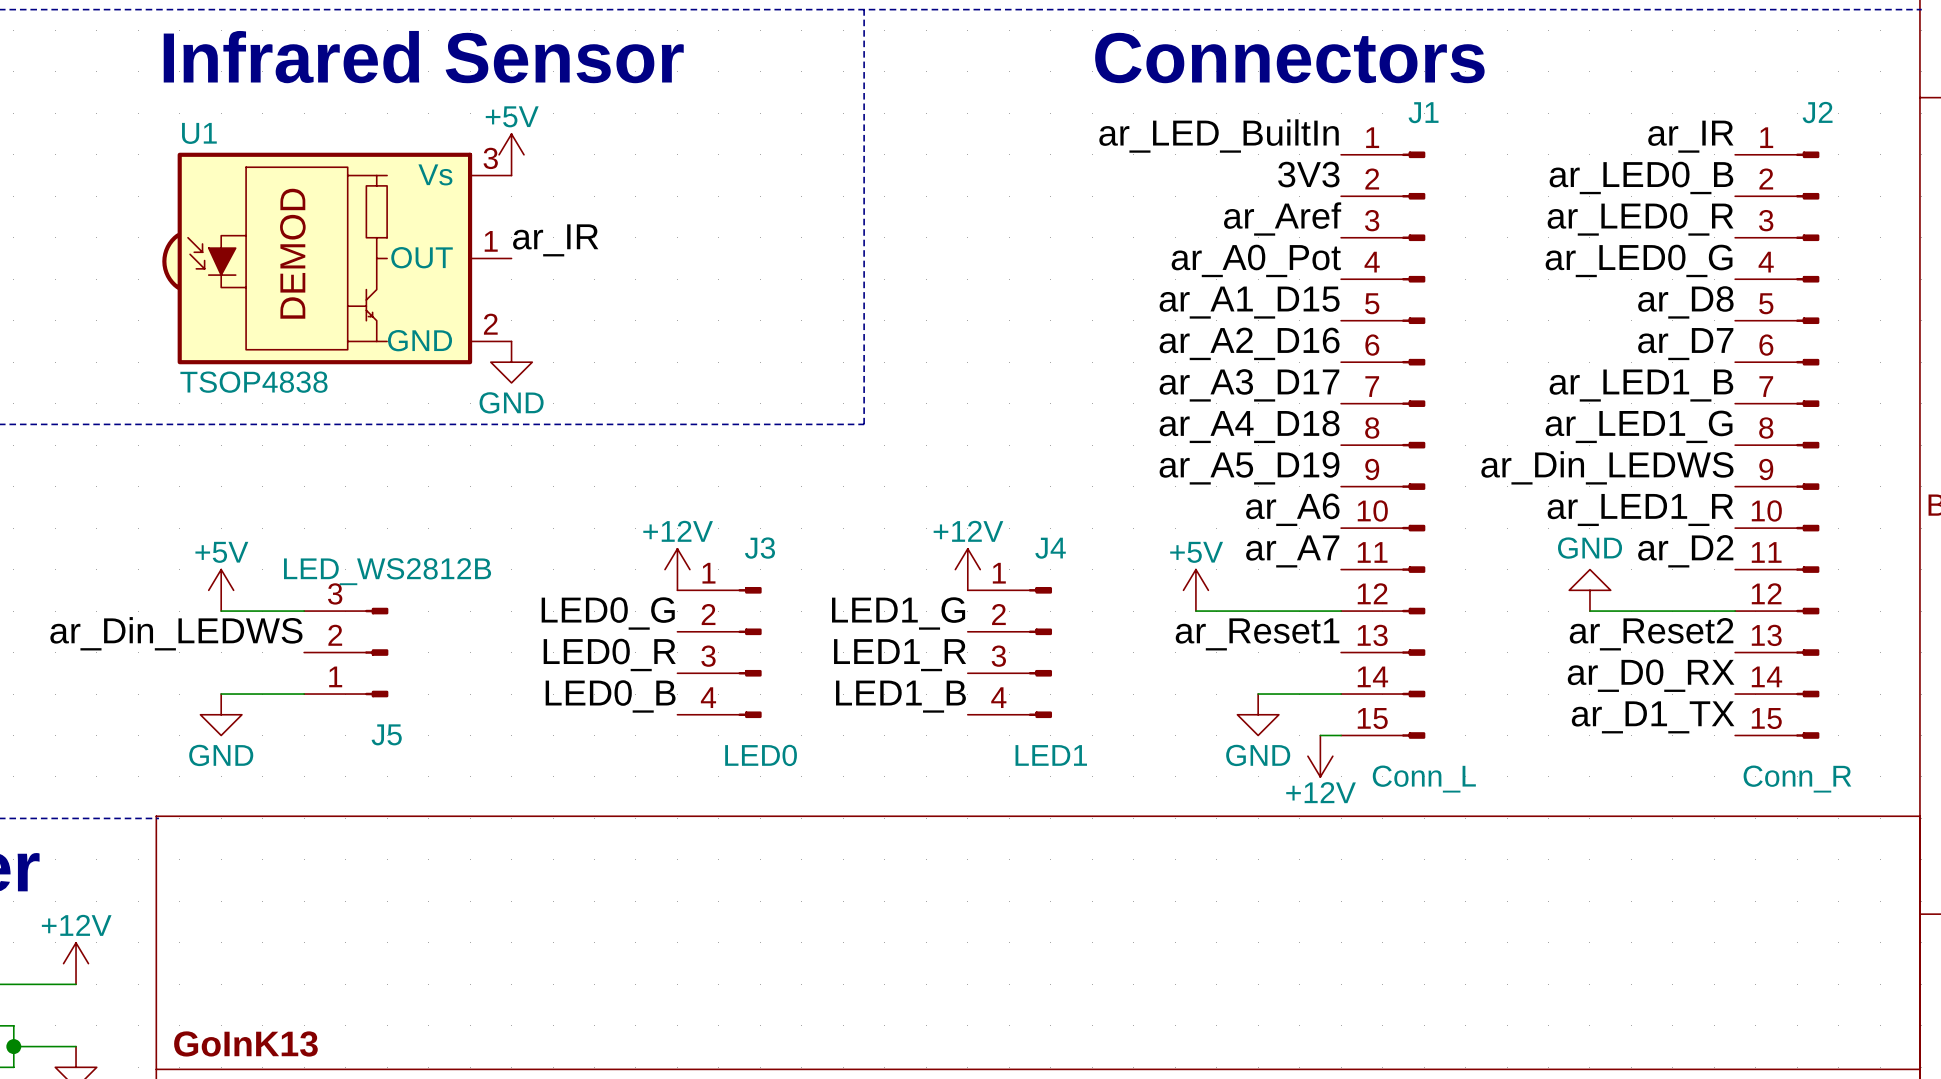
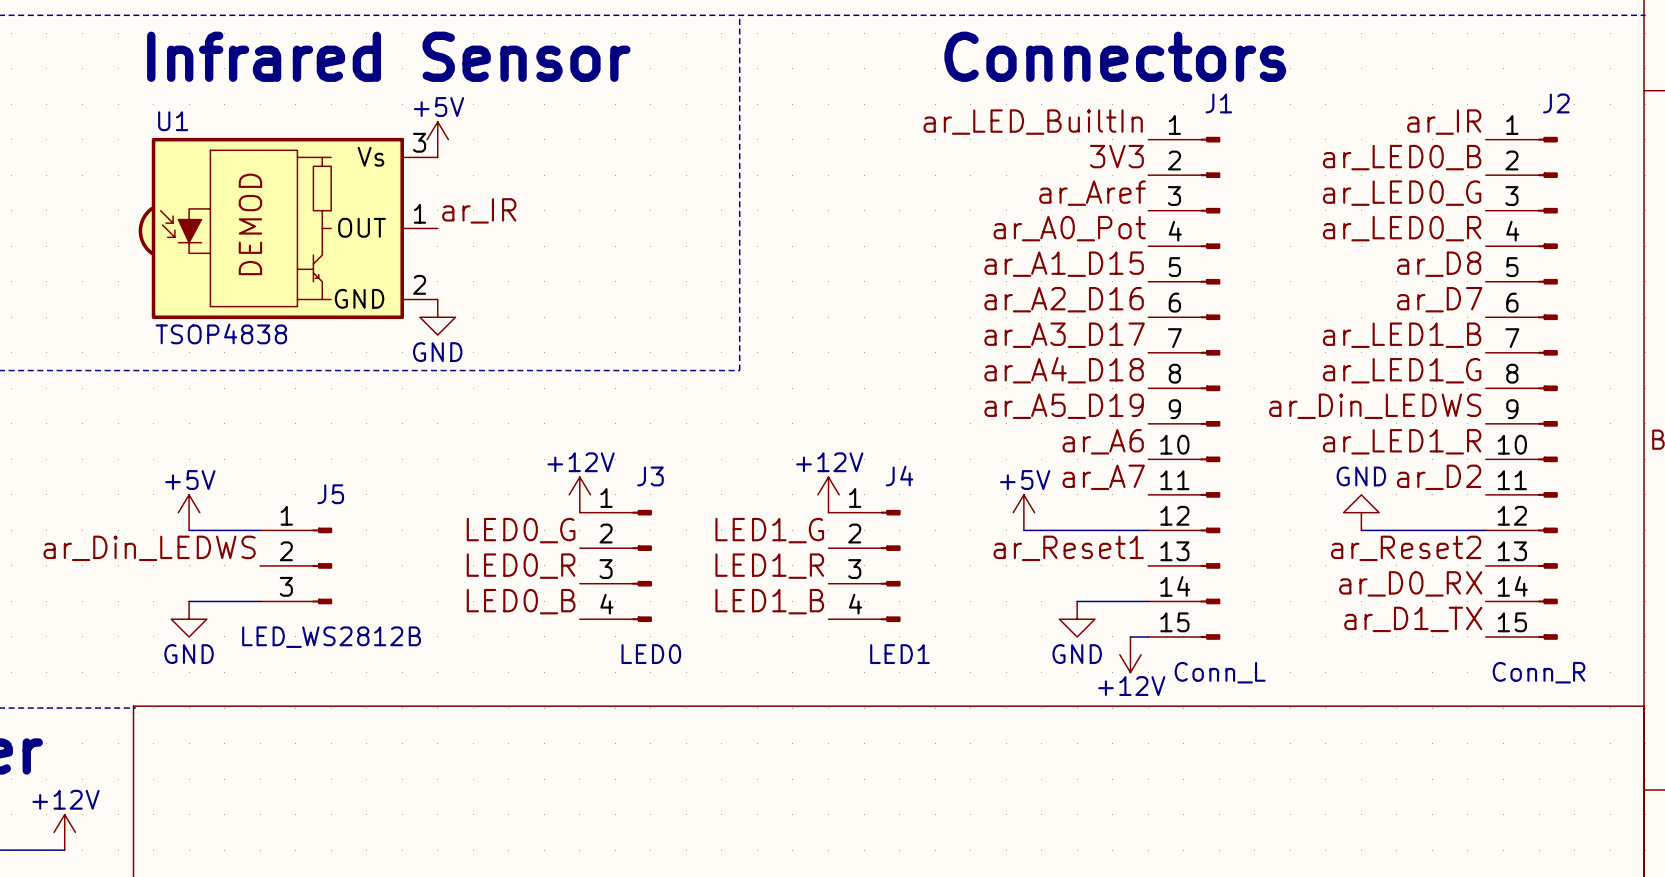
label: ar_LED0_R (1640, 219) -> ar_LED0_G (1402, 193)
label: ar_LED0_G (1639, 260) -> ar_LED0_R (1402, 228)
J5 flip: as is (376, 652) -> up-down (322, 565)

